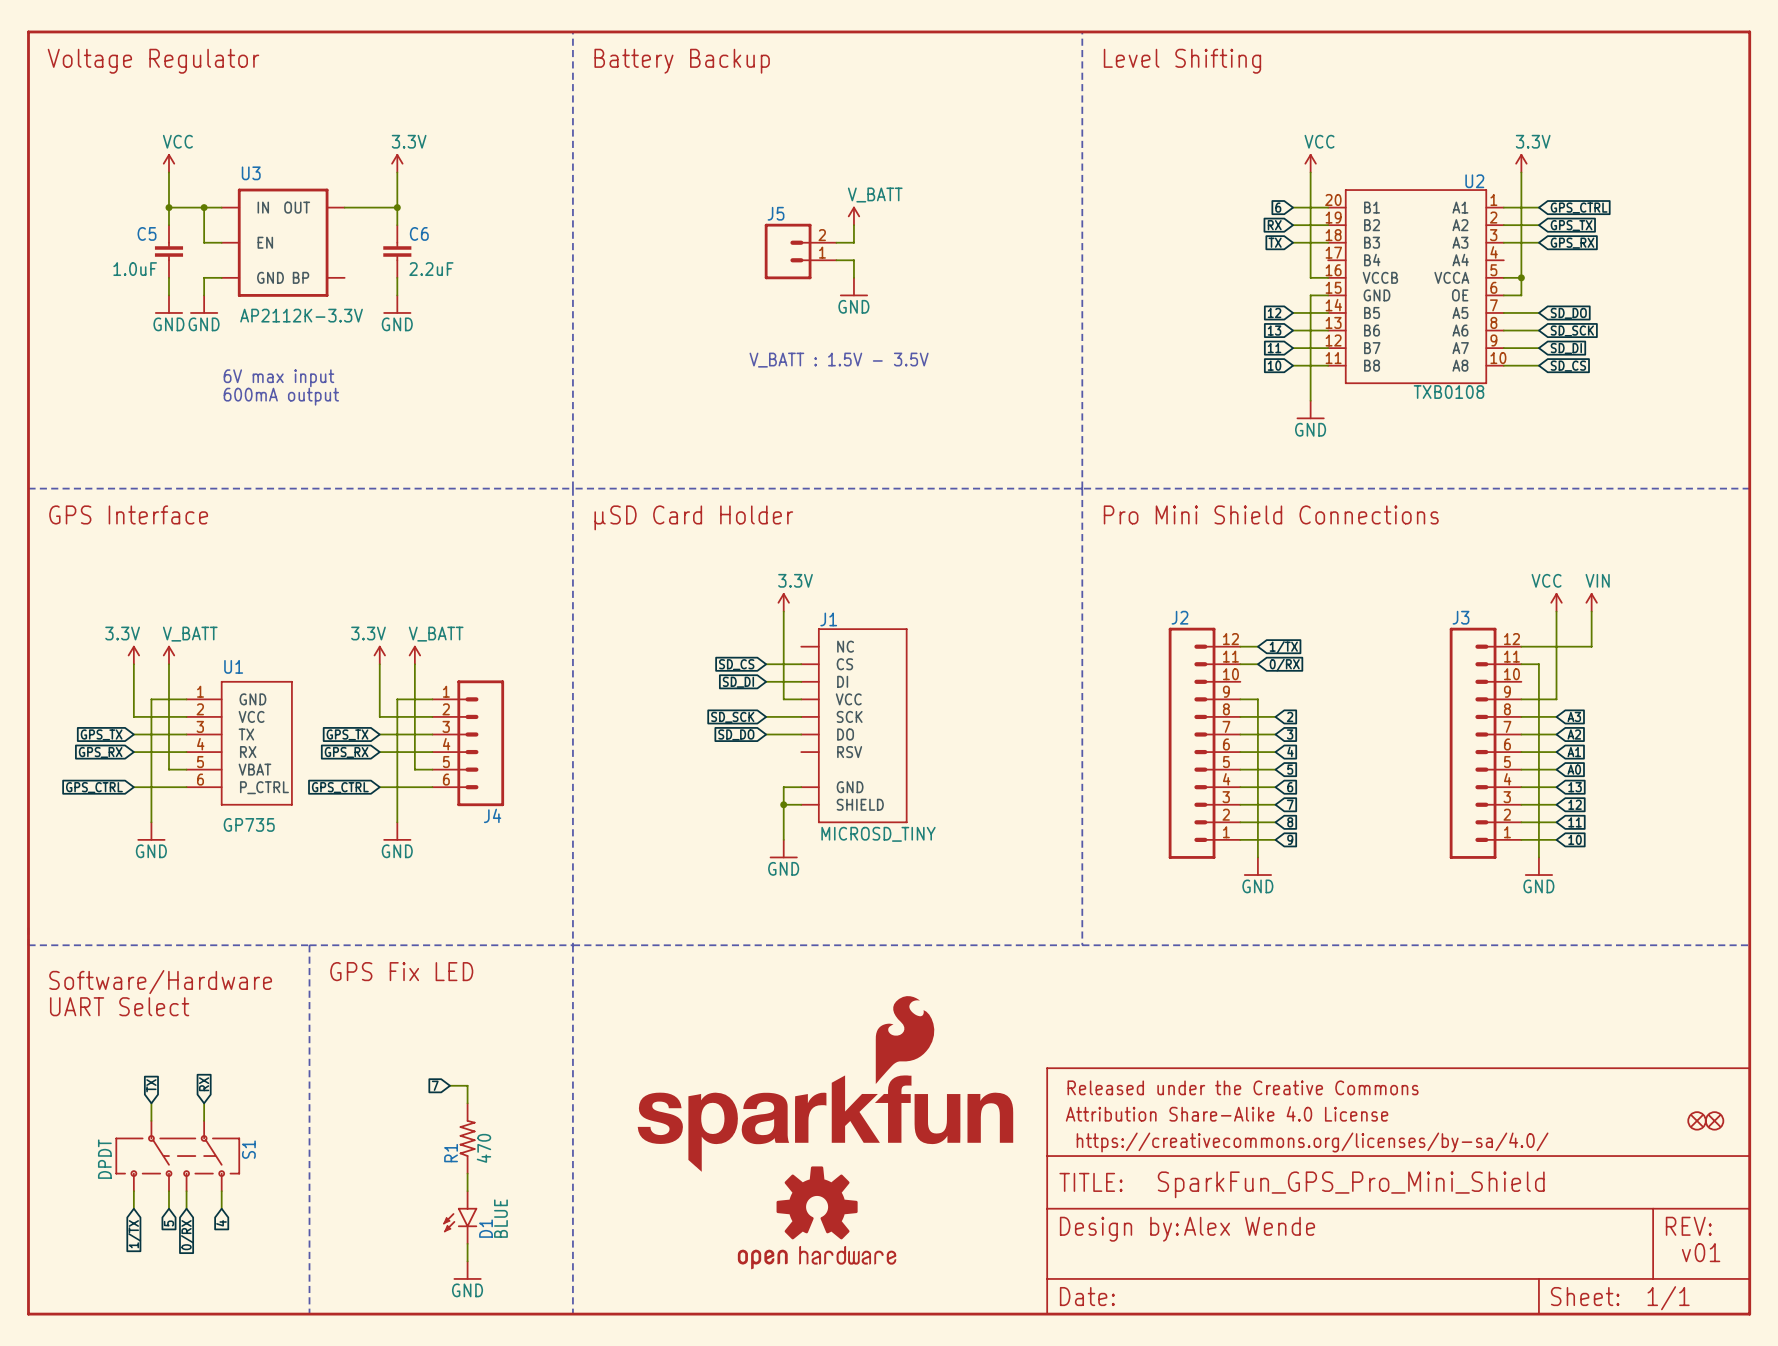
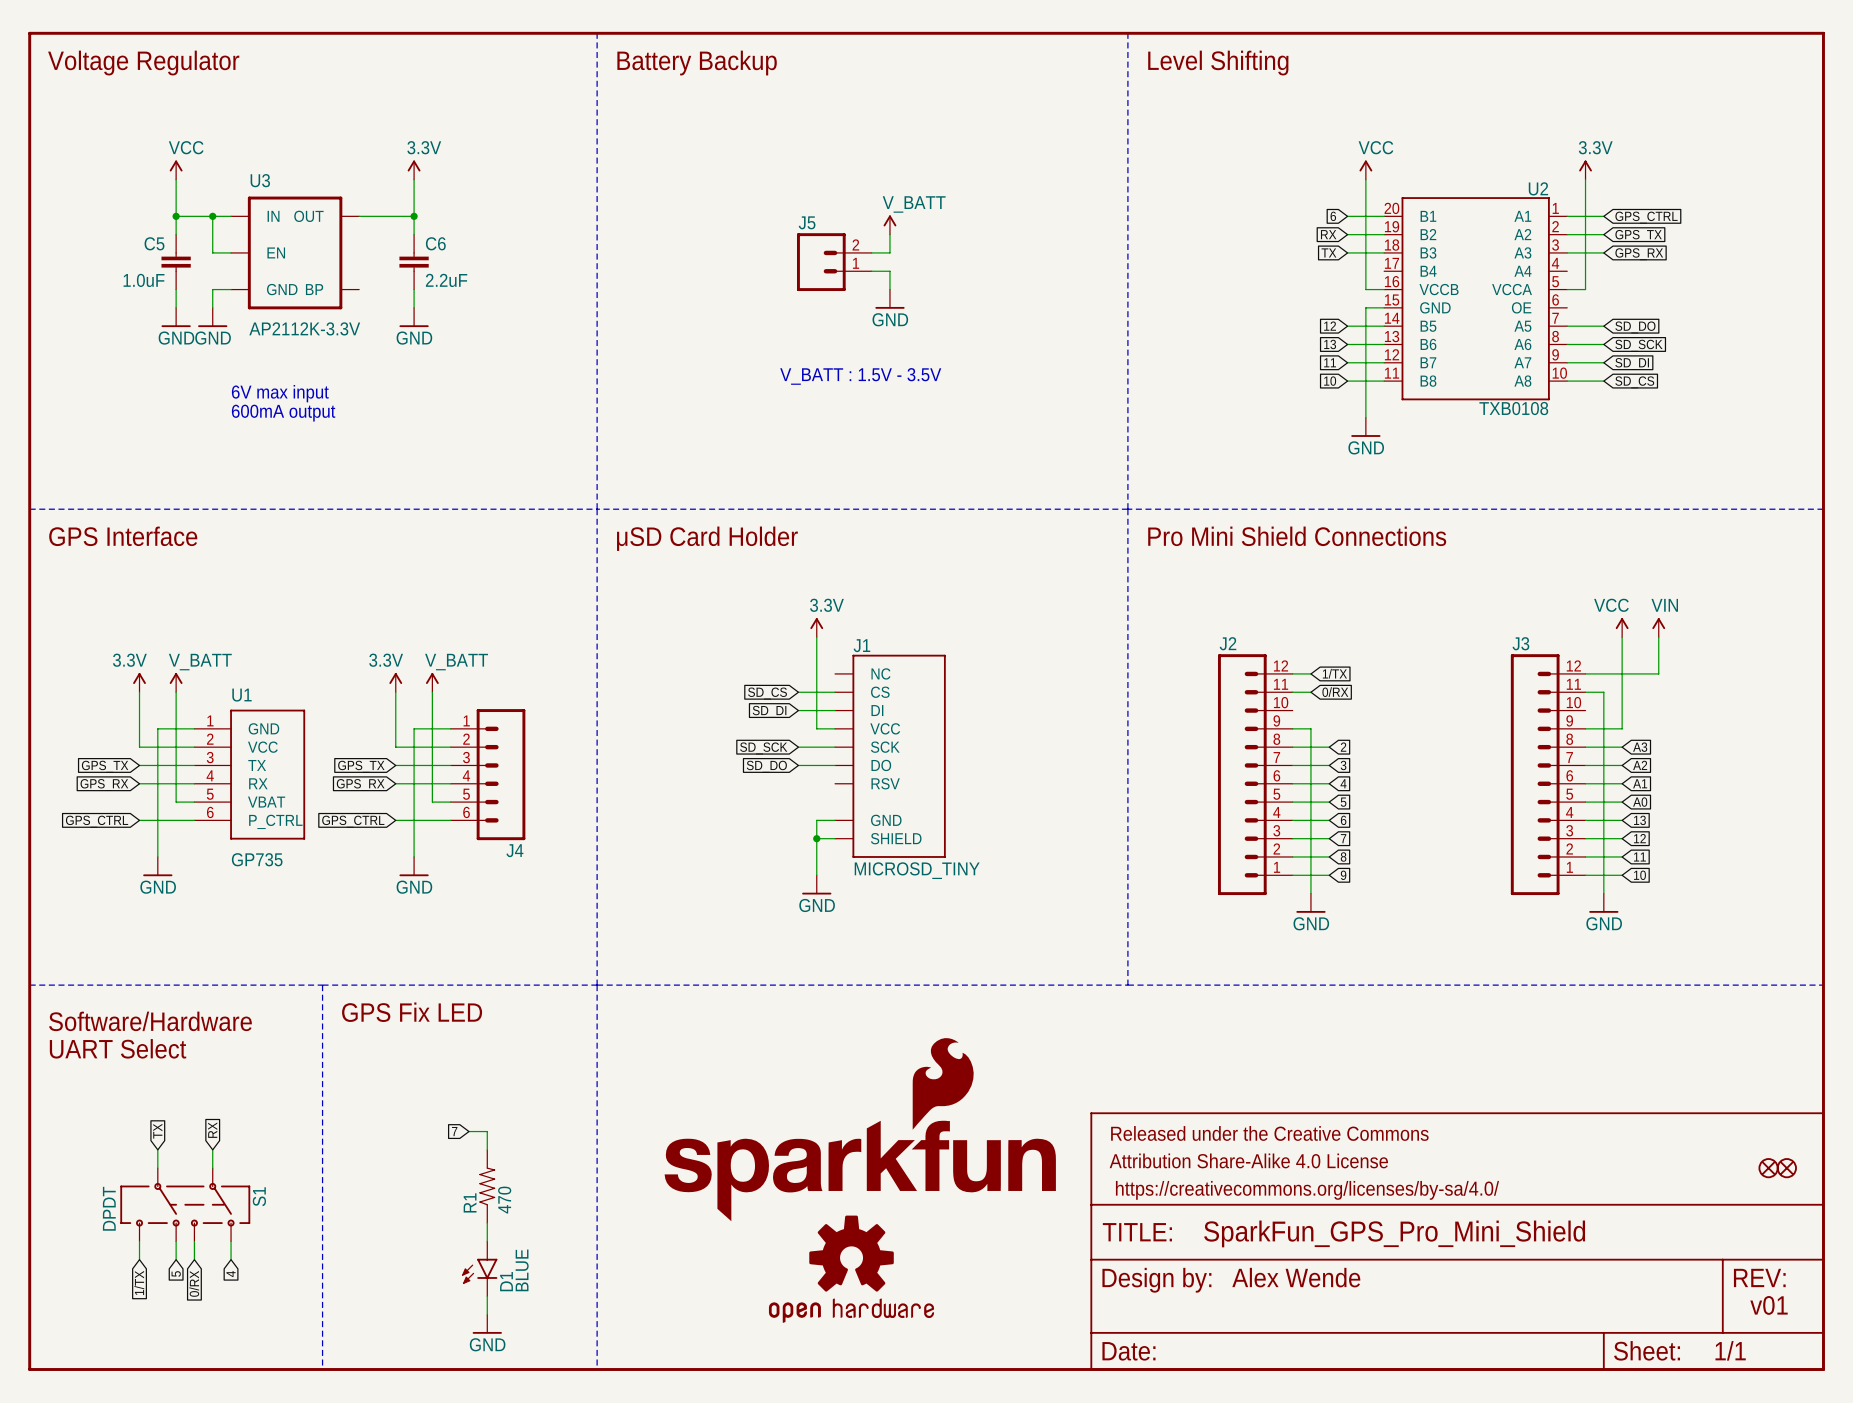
wire: (1521, 277) (1521, 295) (1503, 295) -> none
junction: (1521, 277) -> none

